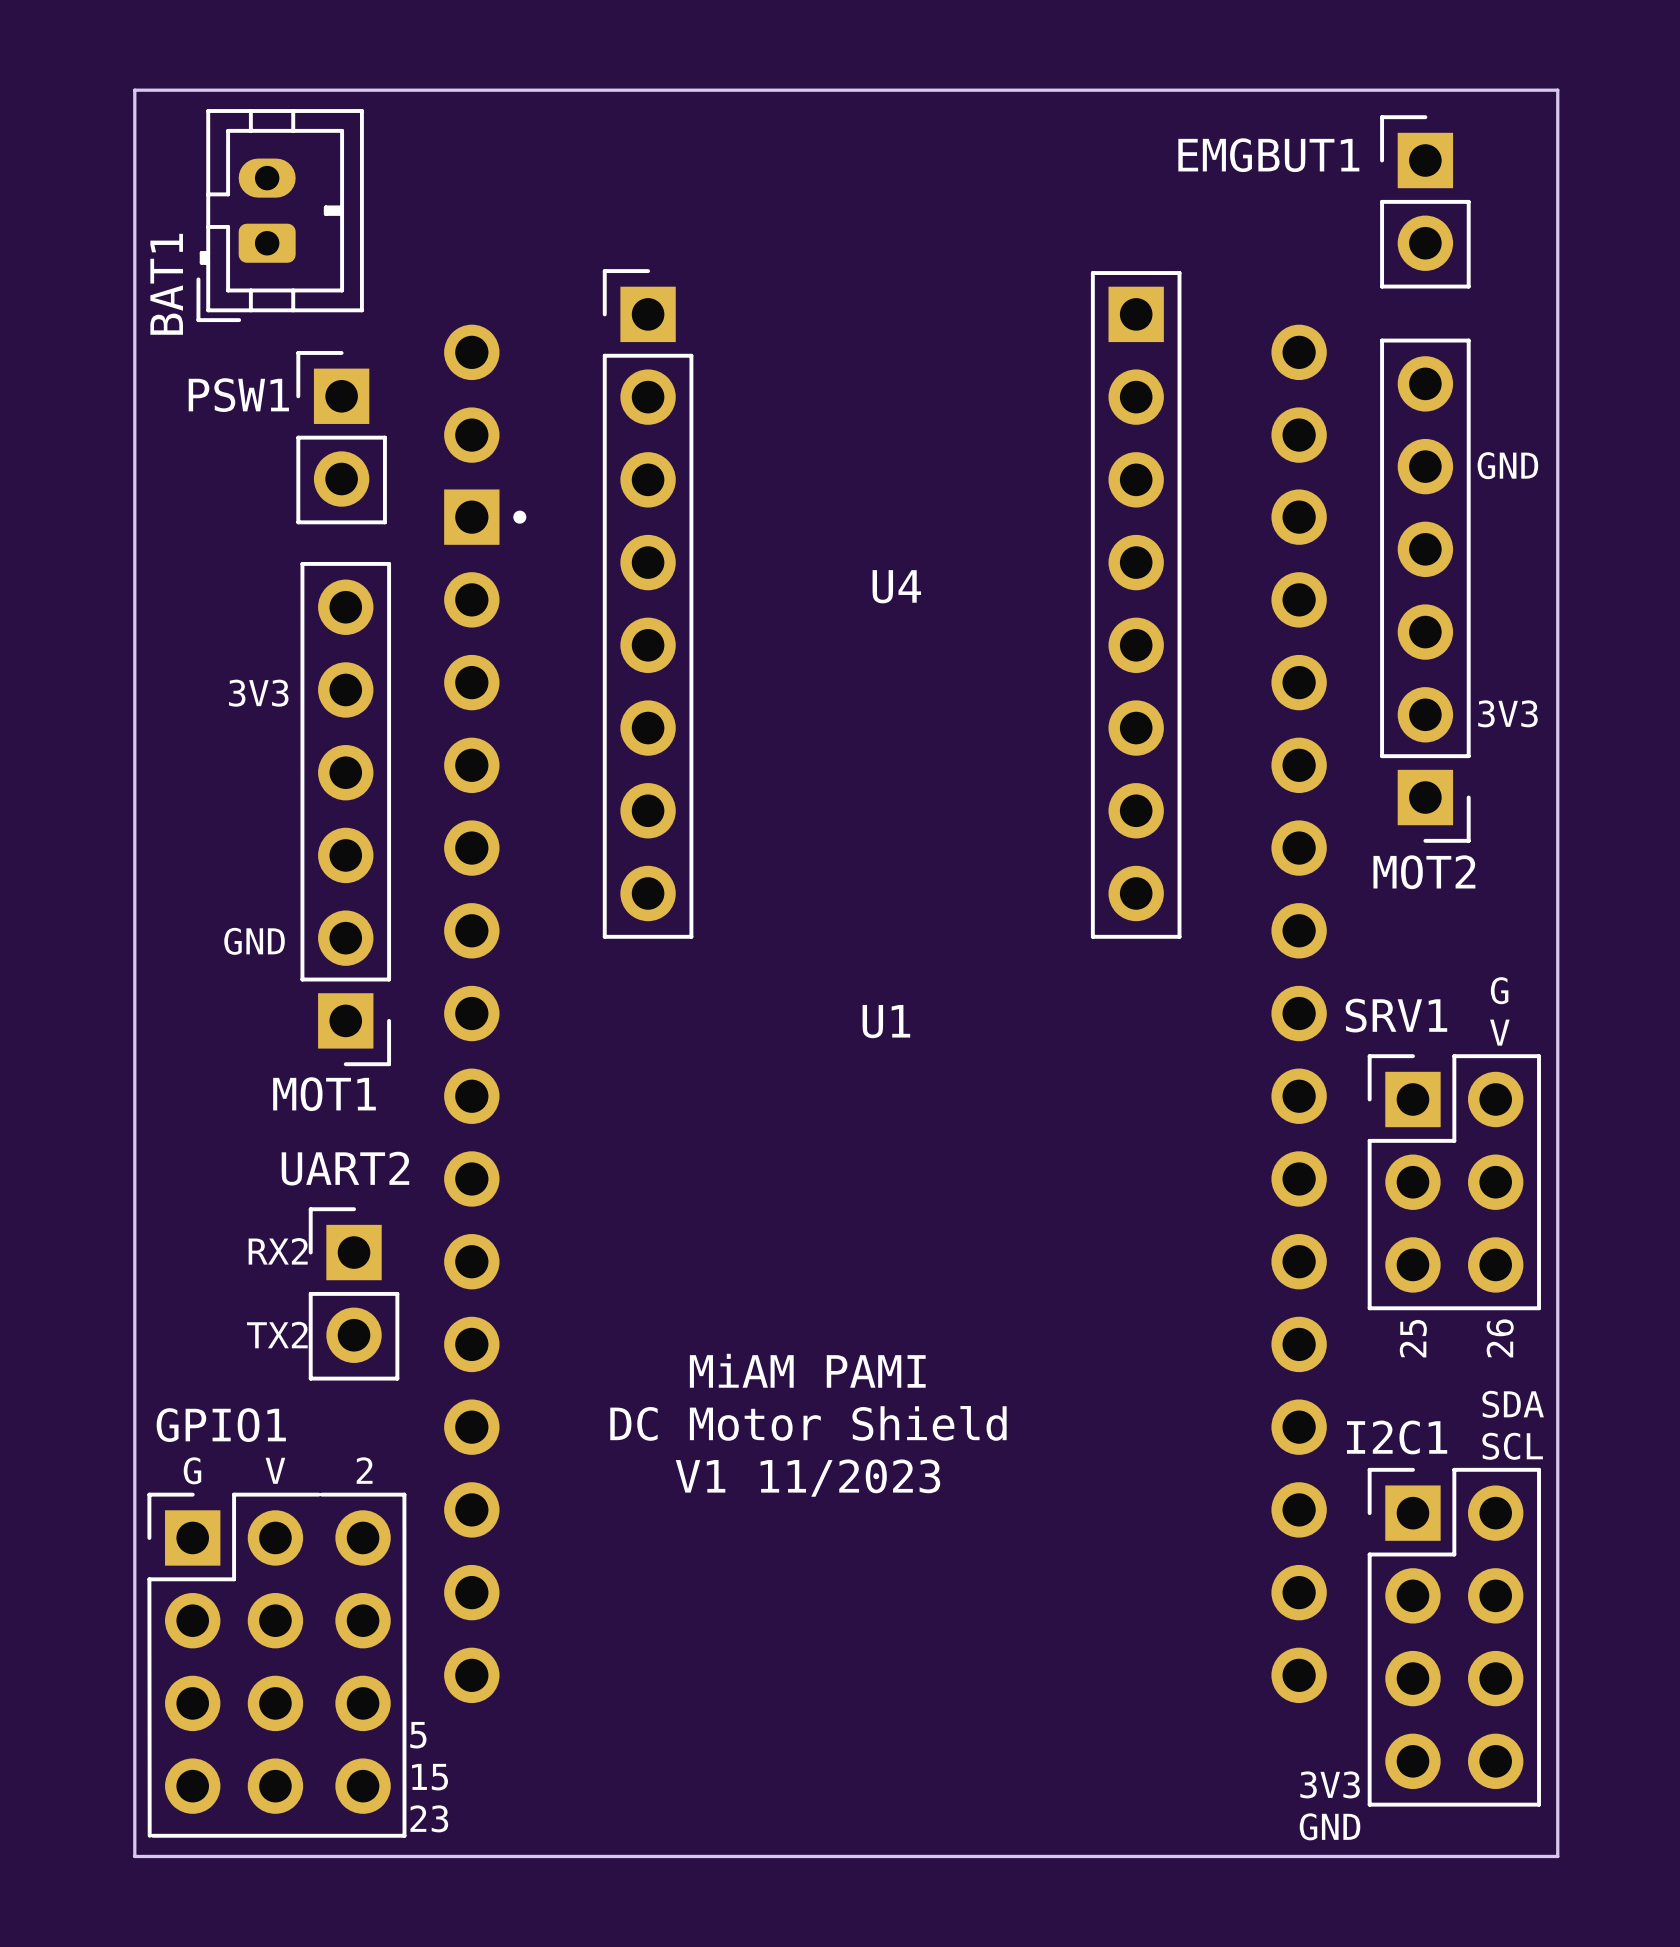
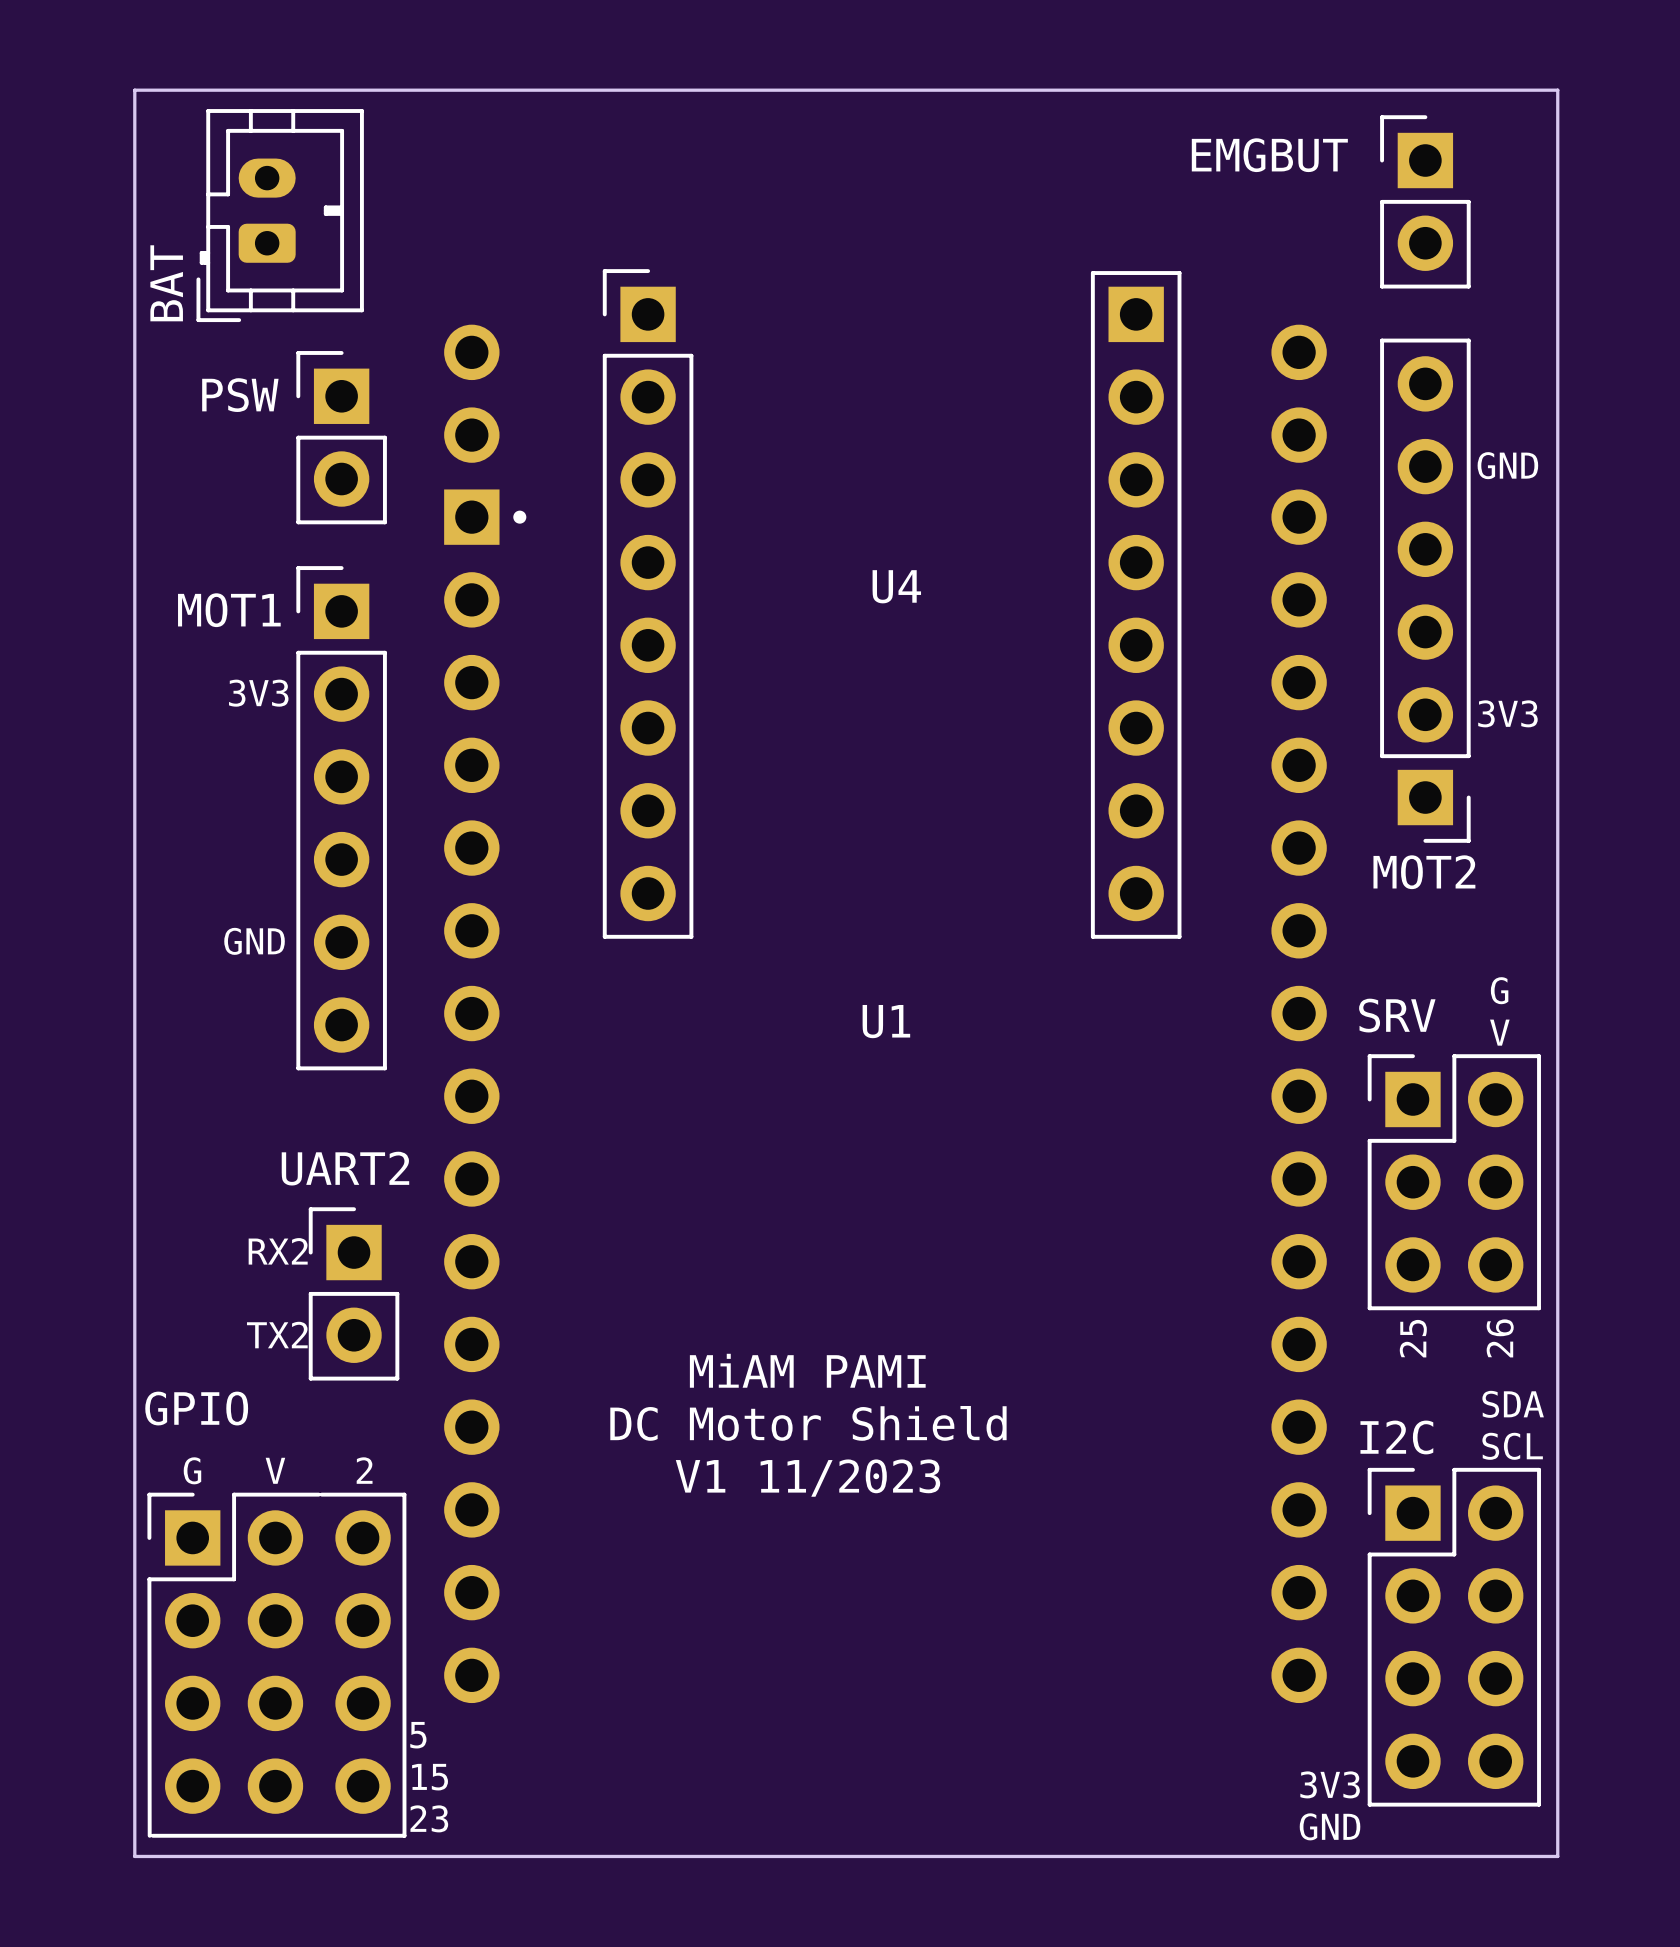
EMGBUT1 name: EMGBUT1 (1268, 155) -> EMGBUT (1269, 155)
BAT1 name: BAT1 (166, 284) -> BAT (166, 283)
PSW1 name: PSW1 (238, 395) -> PSW (240, 395)
MOT1 rotation: 0° (345, 814) -> 180° (341, 818)
SRV1 name: SRV1 (1396, 1015) -> SRV (1397, 1015)
MOT1 name position: MOT1 (324, 1094) -> MOT1 (229, 610)
GPIO1 name: GPIO1 (221, 1425) -> GPIO (196, 1408)
I2C1 name: I2C1 (1397, 1437) -> I2C (1396, 1437)

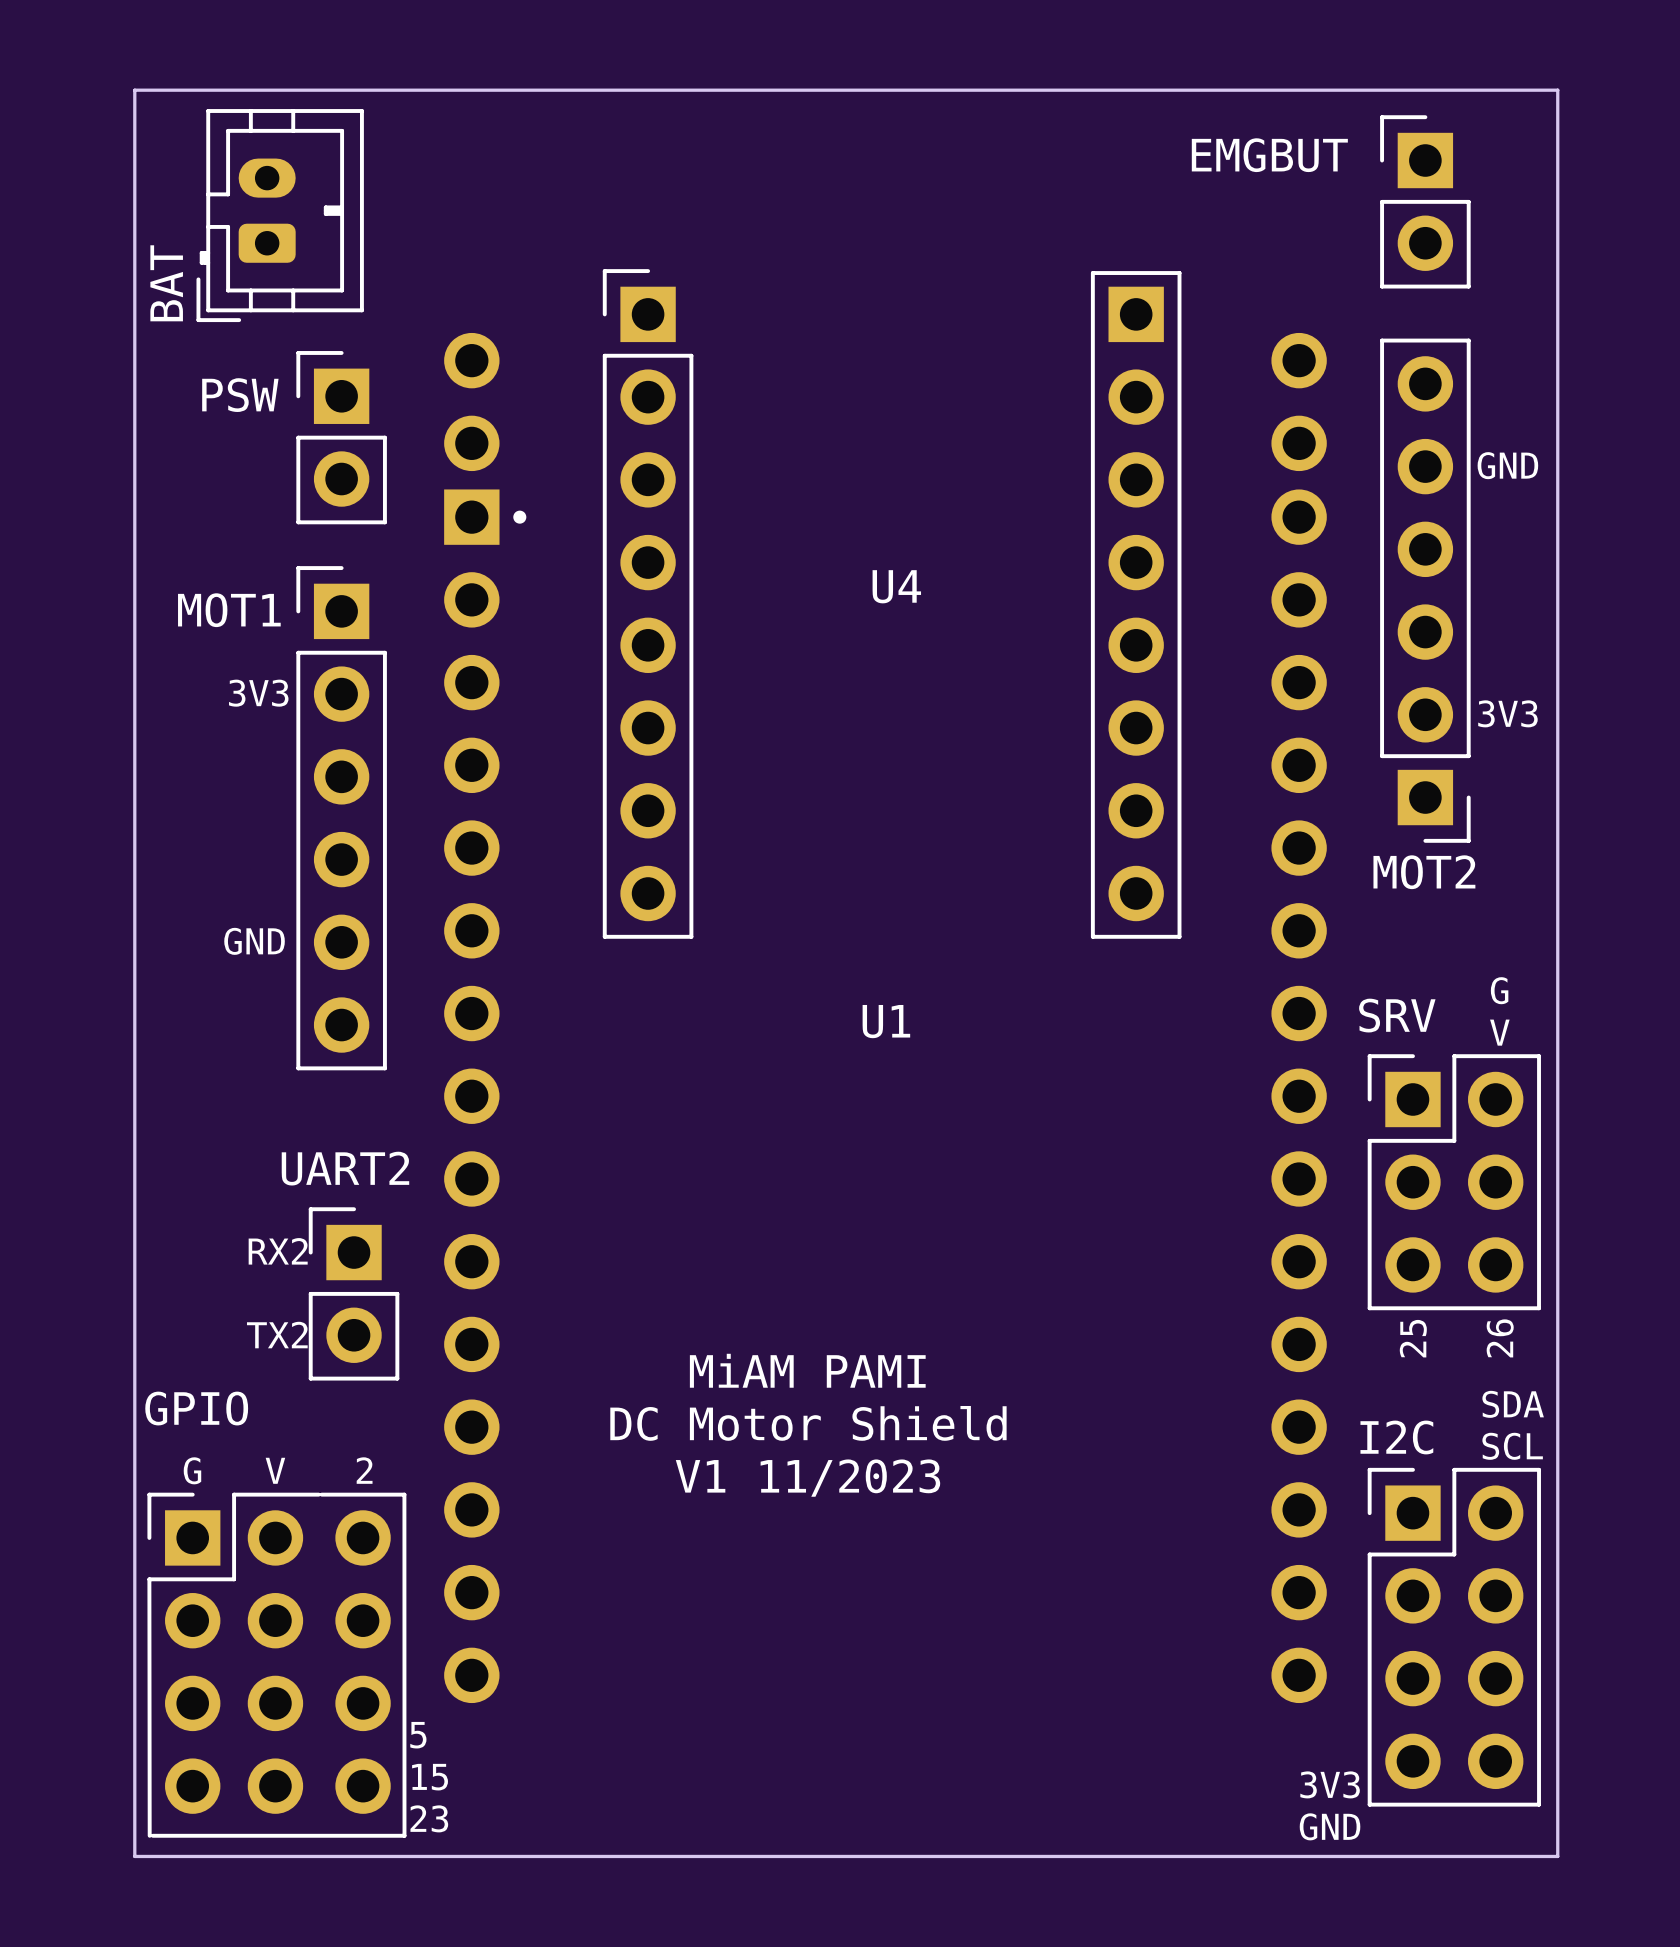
U1 footprint: [444, 324, 1327, 1704] -> [444, 332, 1327, 1704]

